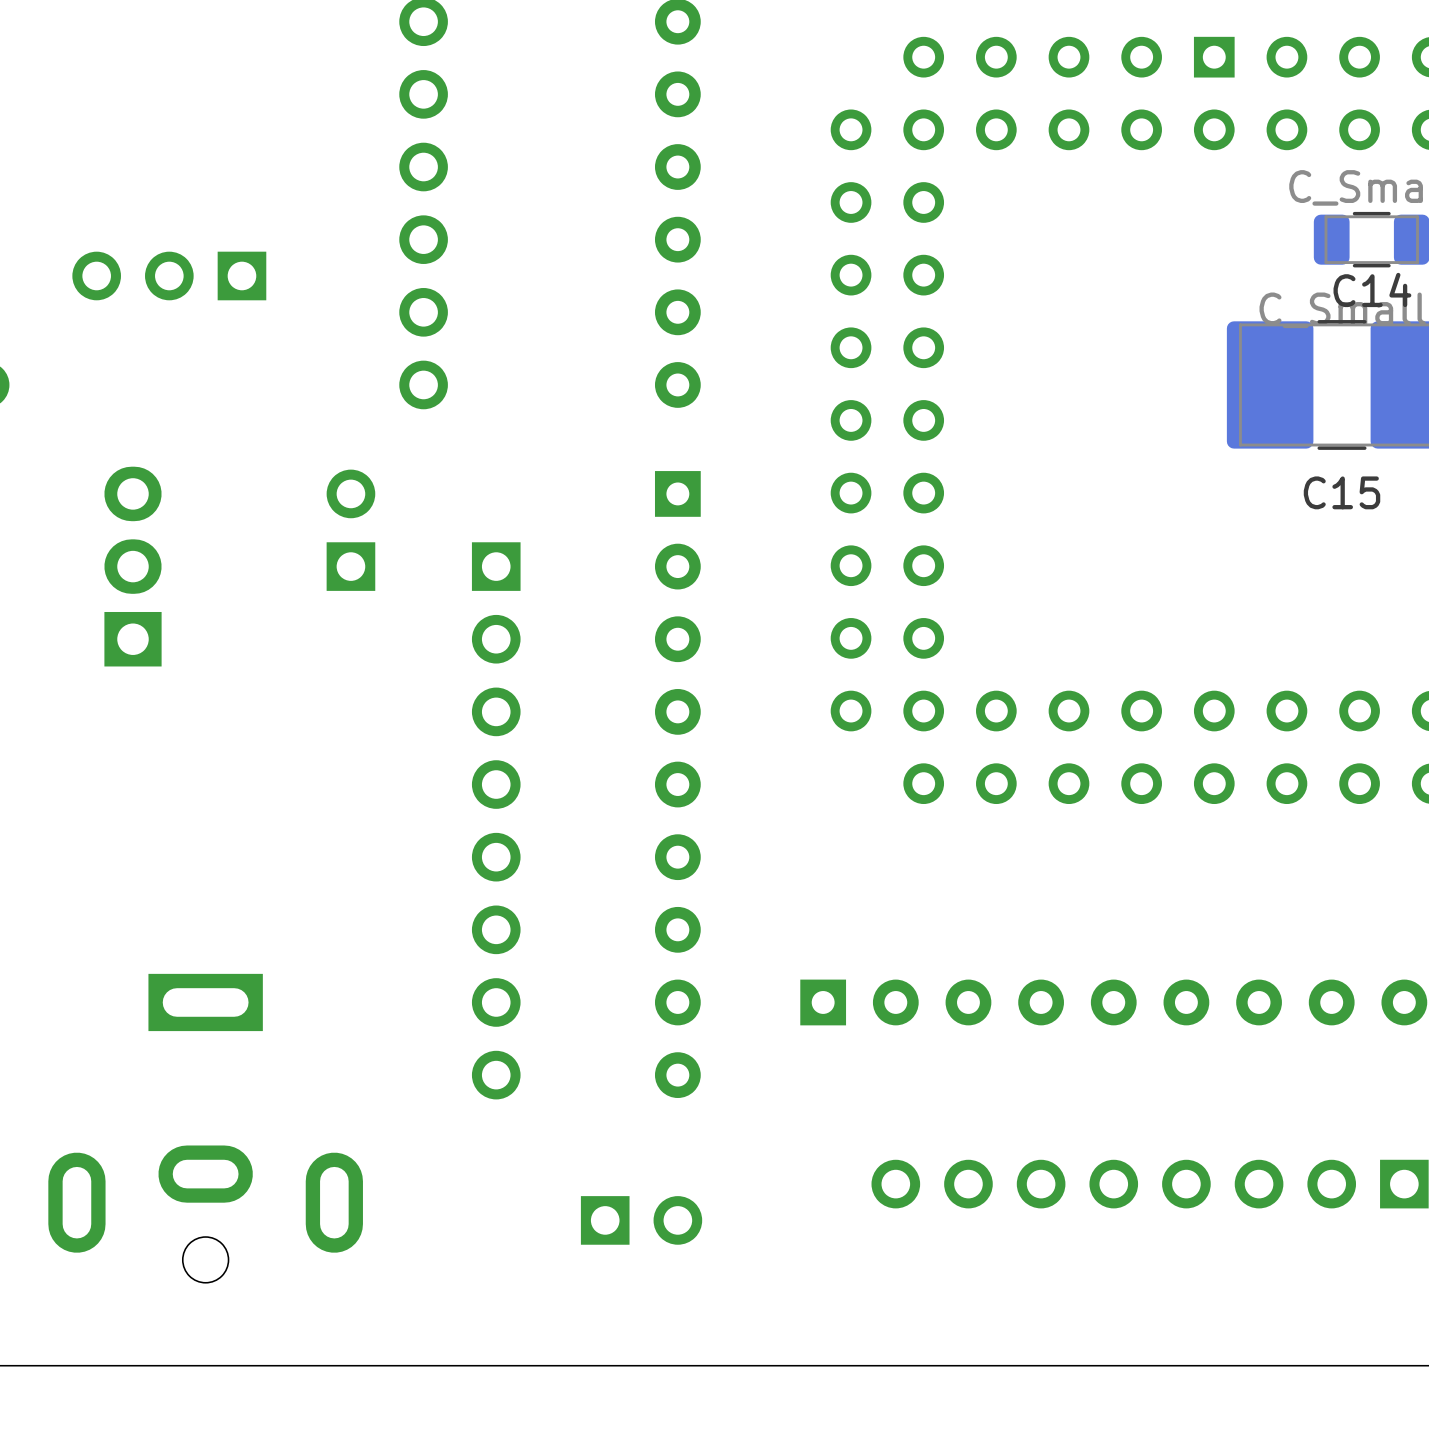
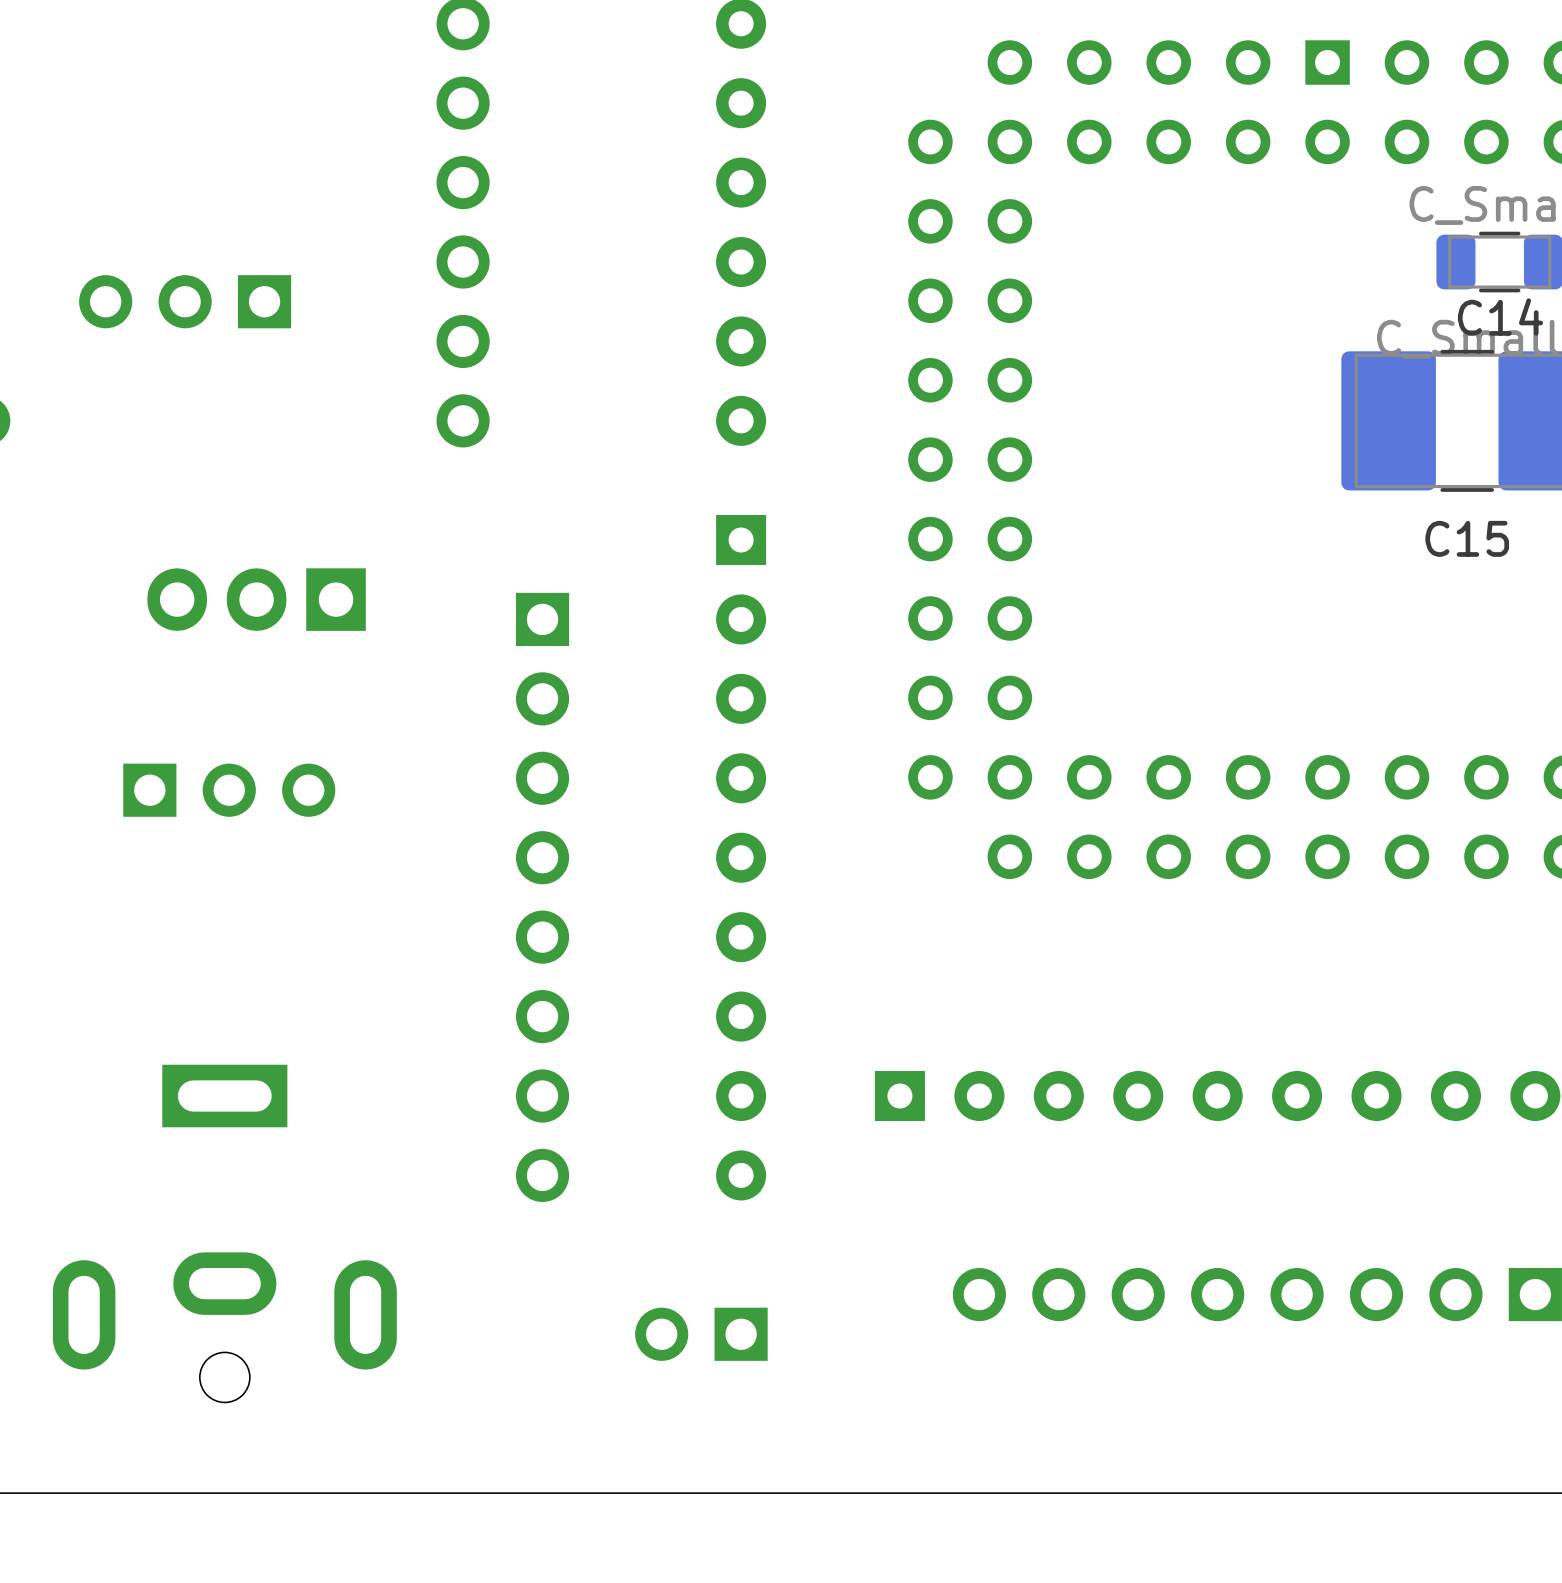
part: (350, 530) -> none
part rotation: 0° (133, 566) -> 90° counterclockwise (256, 599)
part: none -> (229, 790)
part rotation: 0° (641, 1220) -> 180° (701, 1334)

